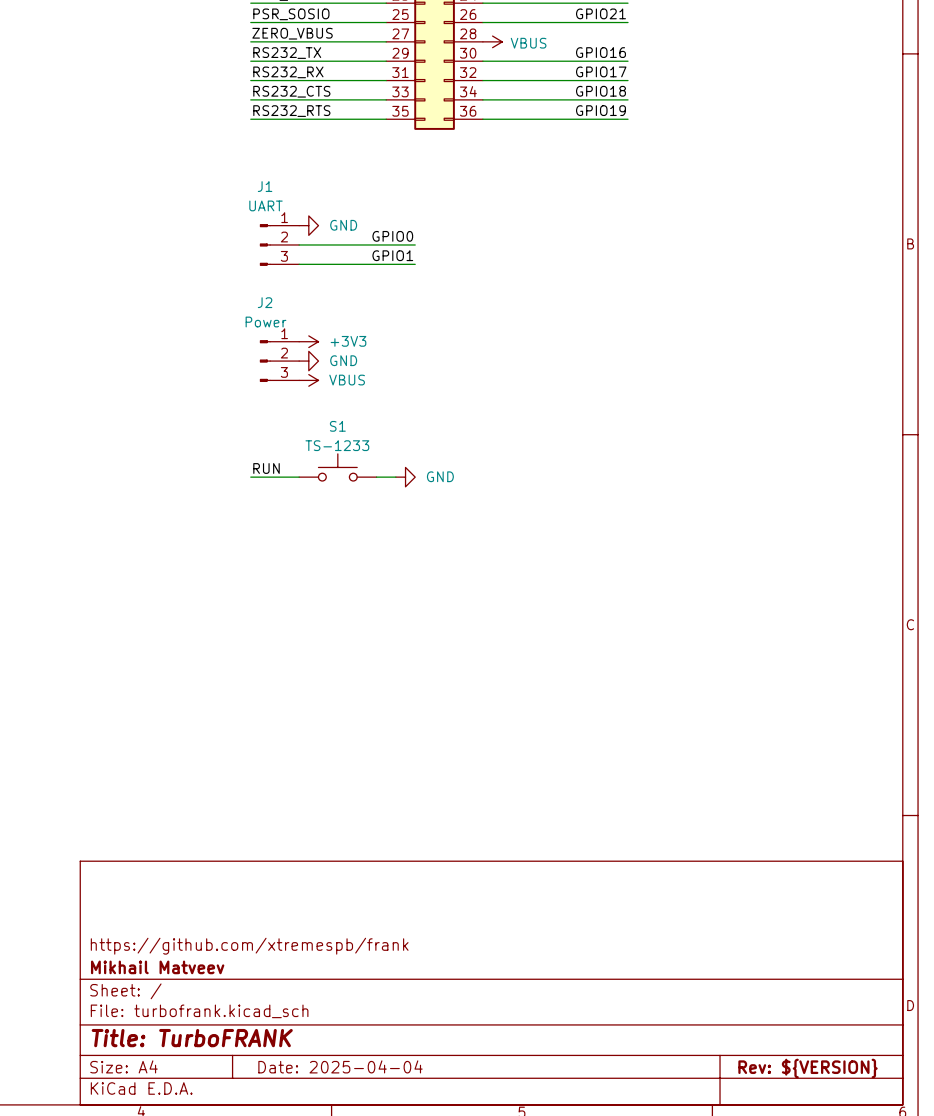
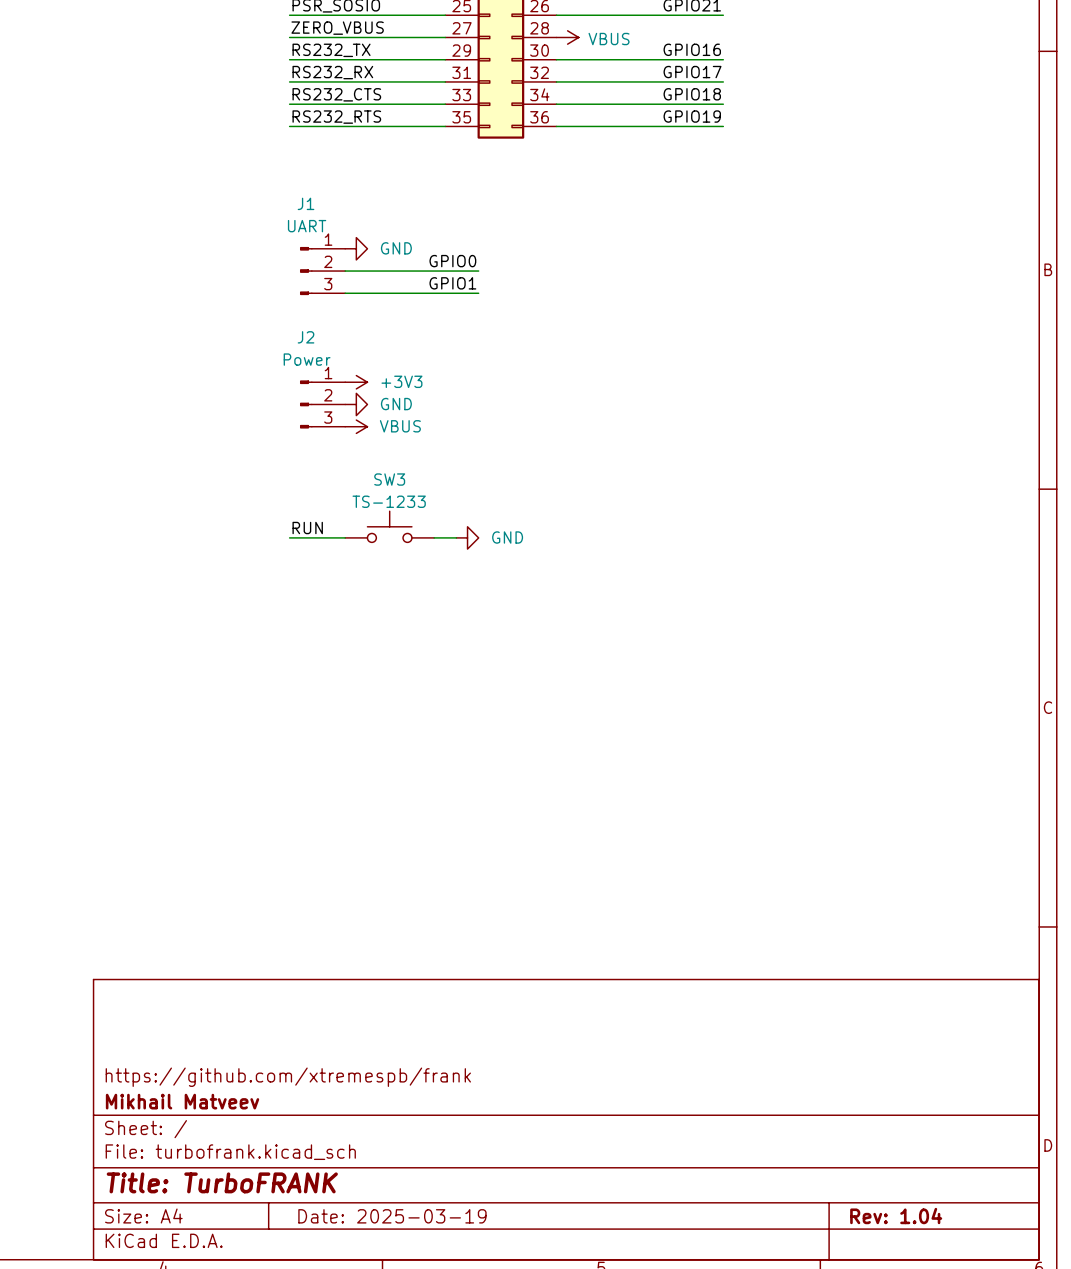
S1 name: S1 (337, 426) -> SW3 (389, 479)
title block: Date: 2025-04-04 (340, 1066) -> Date: 2025-03-19 (392, 1216)
title block: Rev: ${VERSION} (808, 1068) -> Rev: 1.04 (896, 1216)

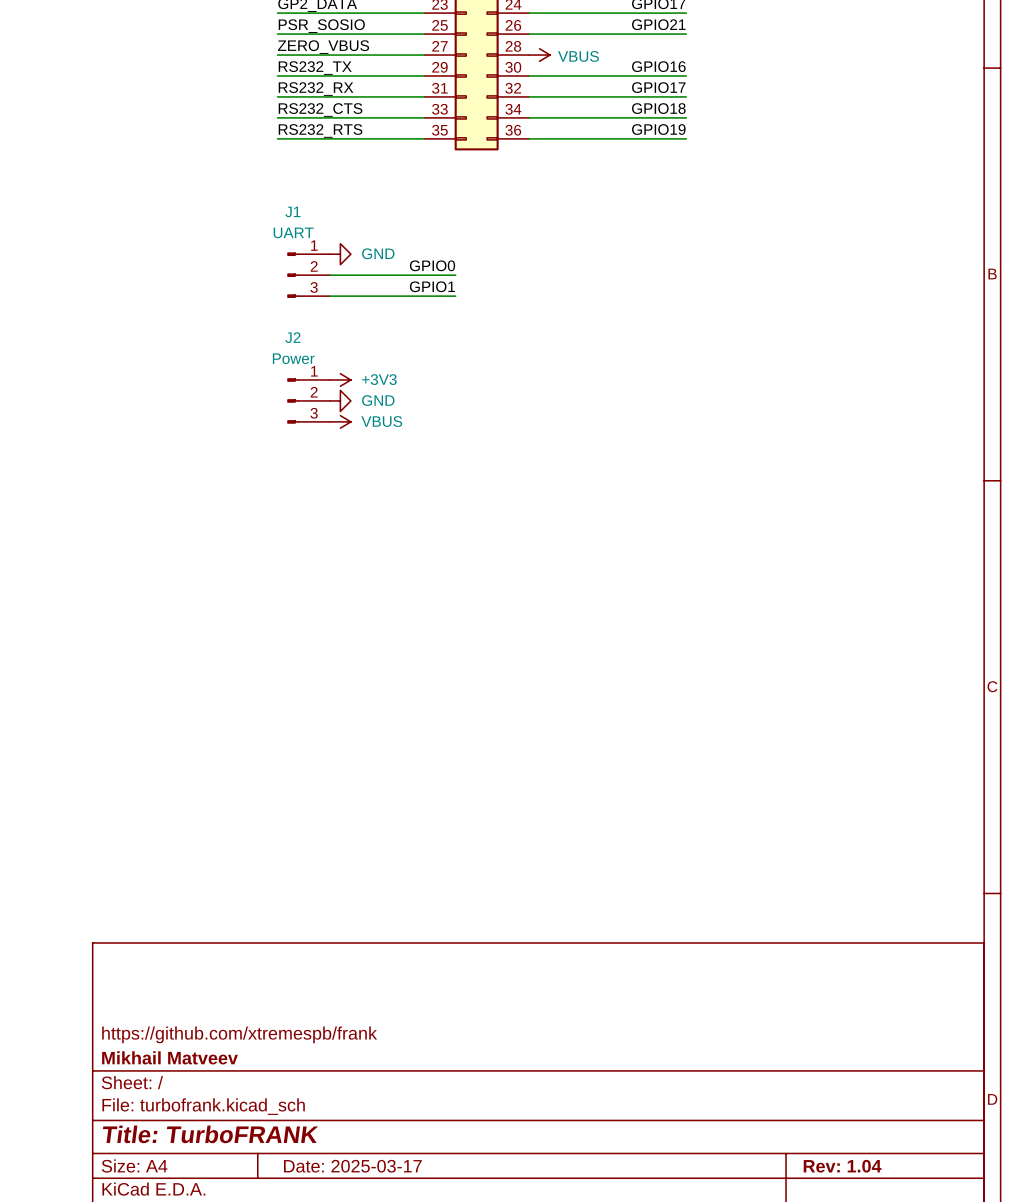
SW3: TS-1233 (389, 526) -> none
label: RUN (307, 528) -> none
wire: (289, 537) (345, 537) -> none
wire: (434, 537) (456, 537) -> none
power symbol: GND (467, 537) -> none
title block: Date: 2025-03-19 (392, 1216) -> Date: 2025-03-17 (352, 1166)

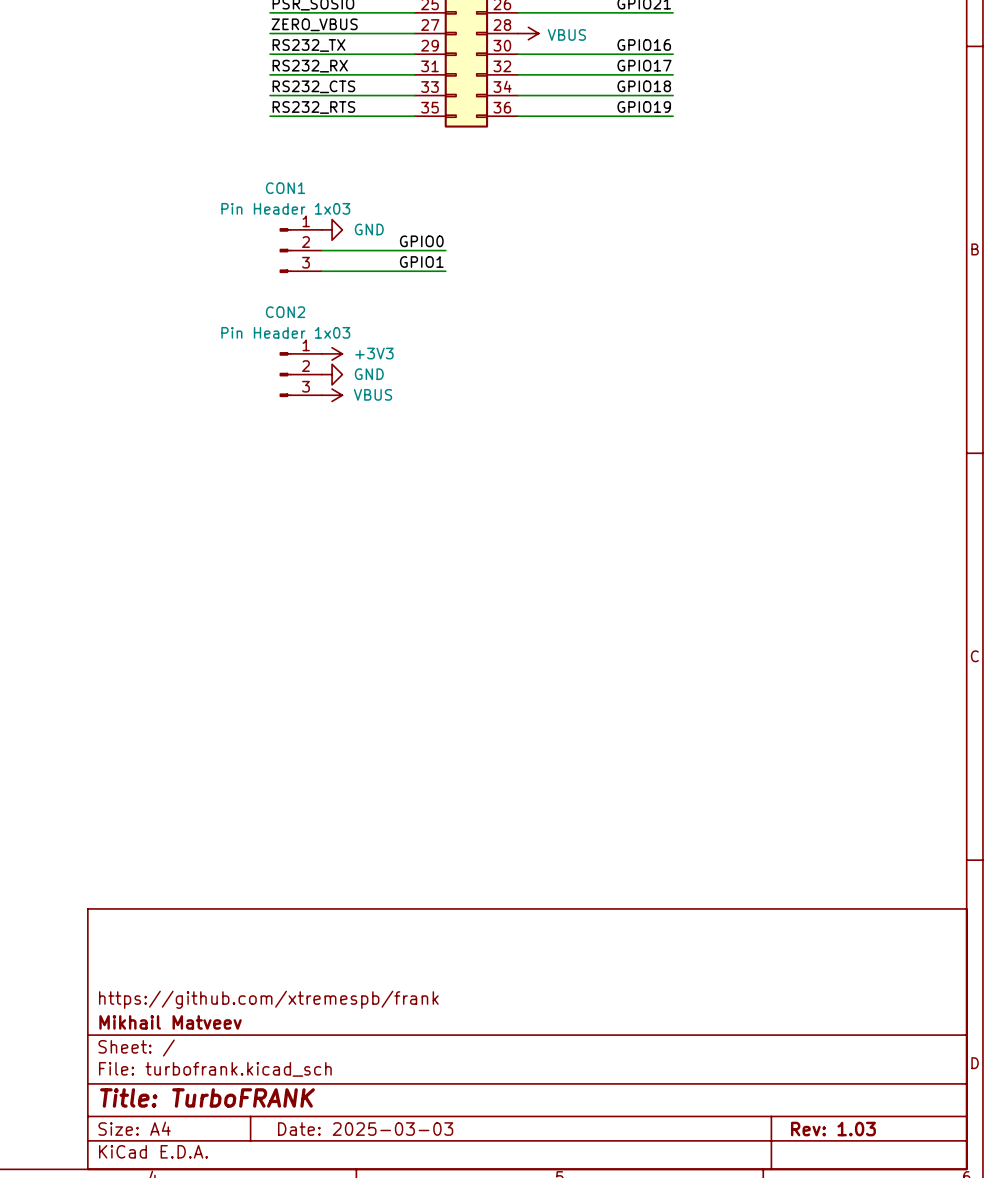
J1 name: J1 (292, 211) -> CON1 (285, 188)
J1 value: UART (293, 232) -> Pin Header 1x03 (285, 208)
J2 name: J2 (292, 337) -> CON2 (285, 312)
J2 value: Power (293, 358) -> Pin Header 1x03 (285, 332)
title block: Date: 2025-03-17 (352, 1166) -> Date: 2025-03-03 (365, 1129)
title block: Rev: 1.04 (842, 1166) -> Rev: 1.03 (833, 1129)

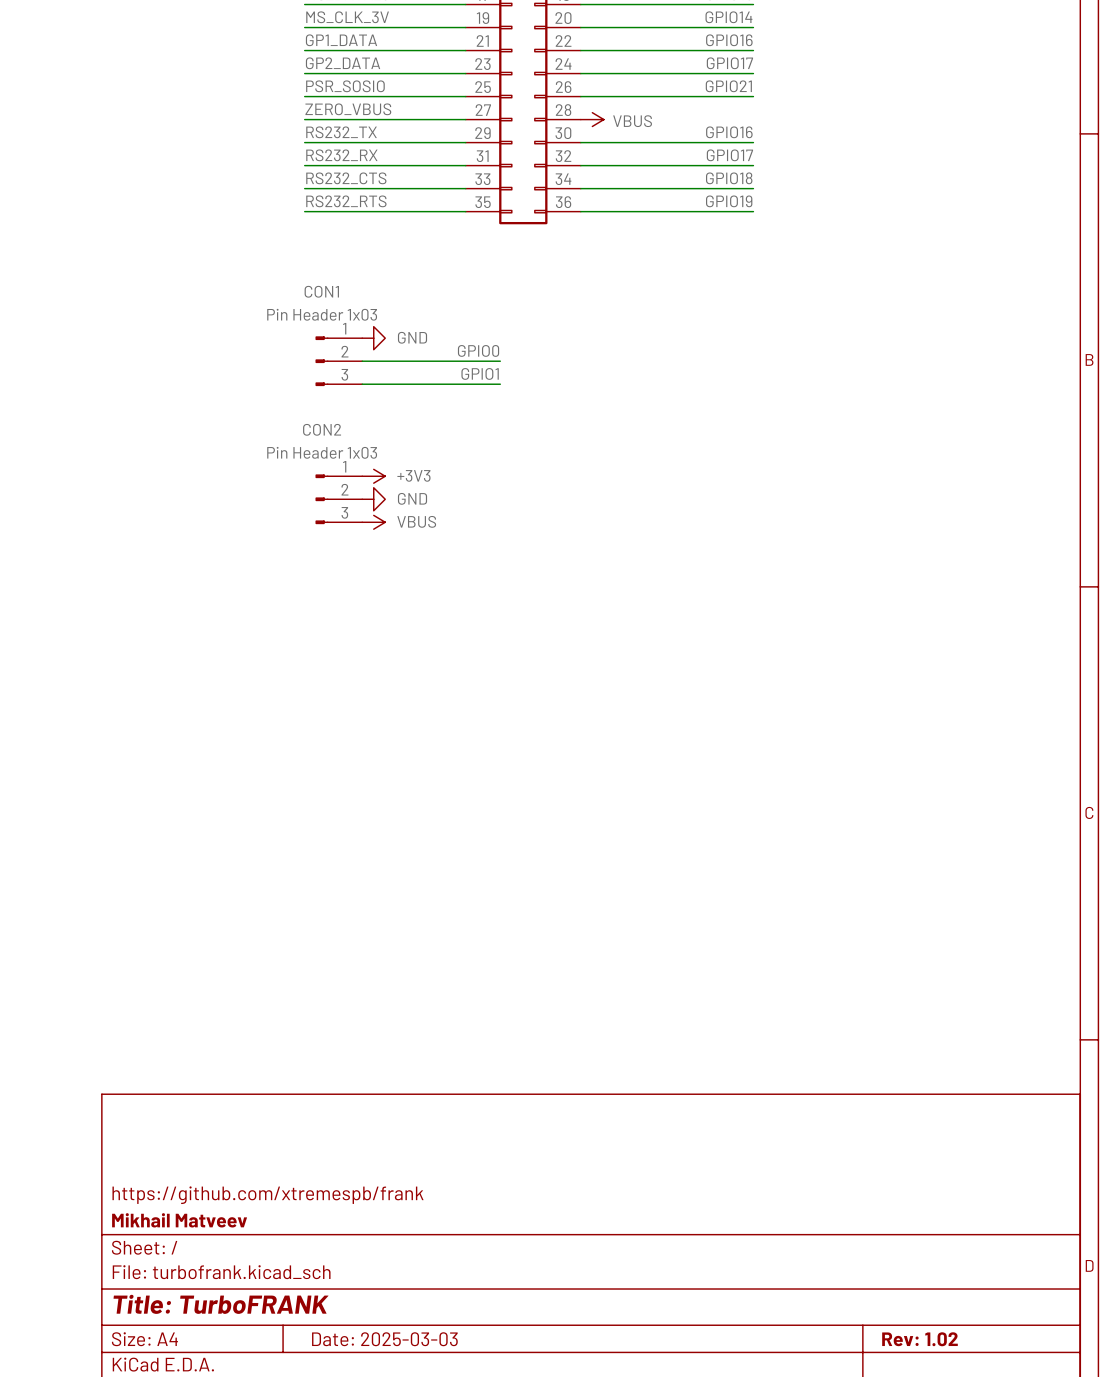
title block: Rev: 1.03 (833, 1129) -> Rev: 1.02 (919, 1339)

